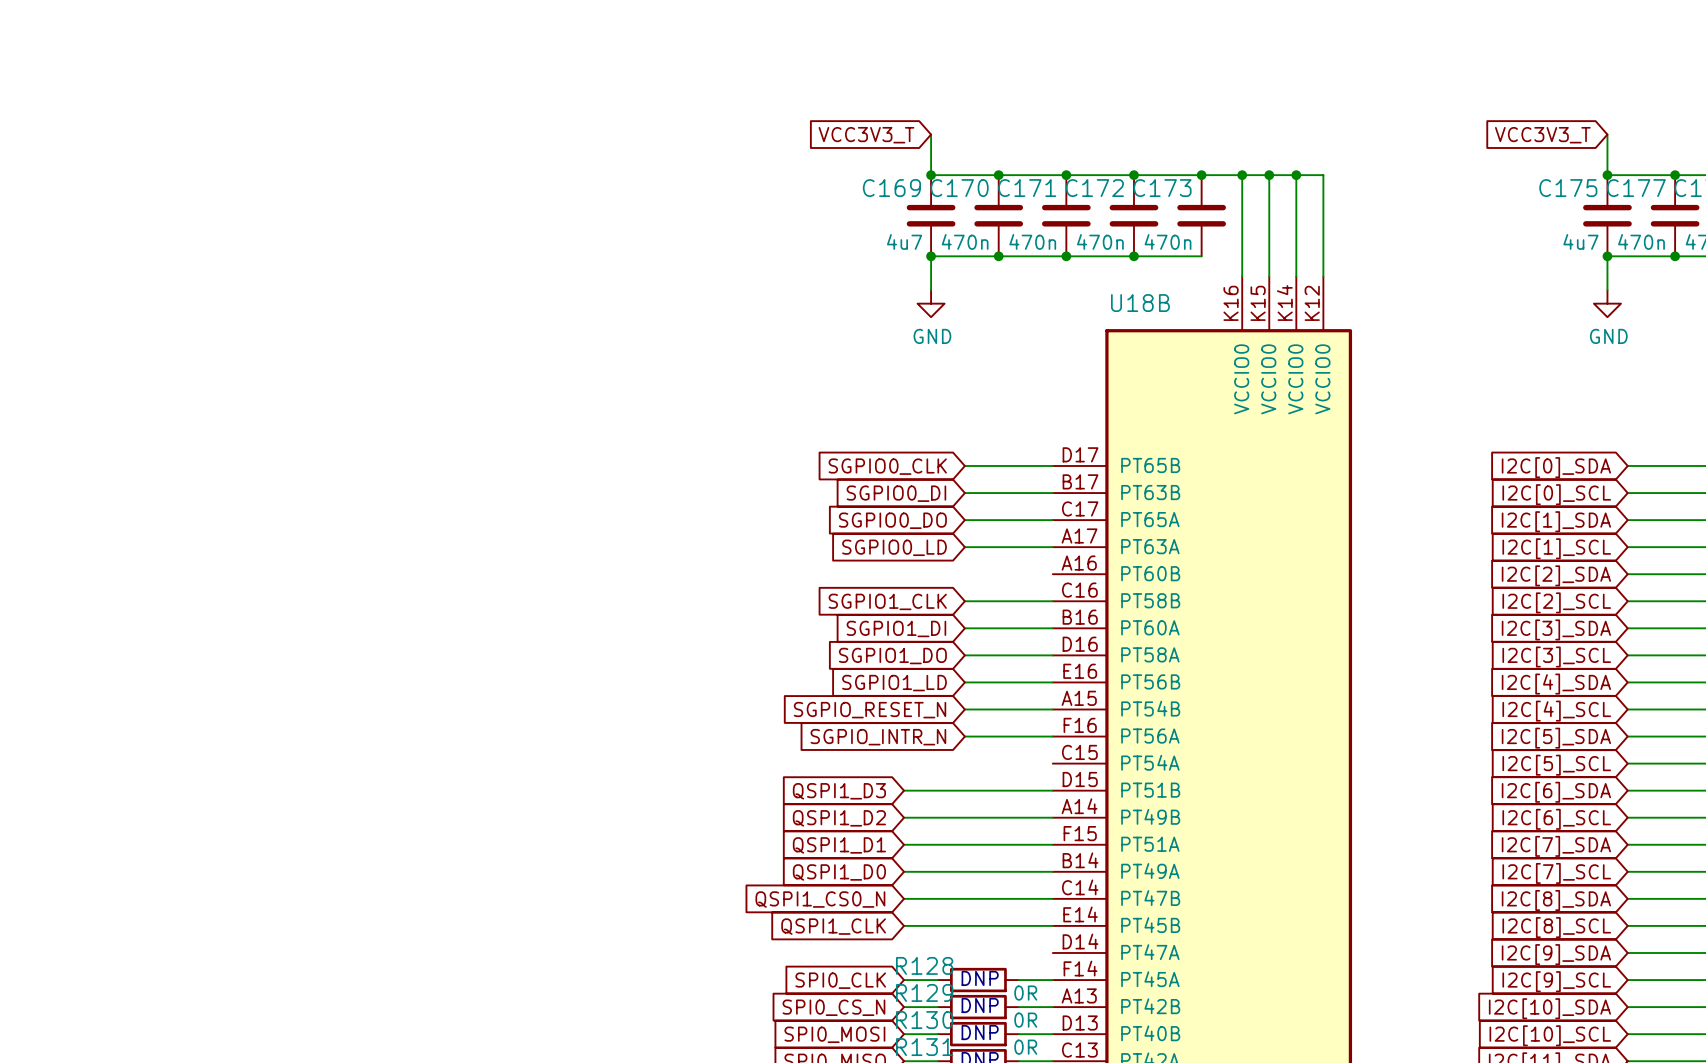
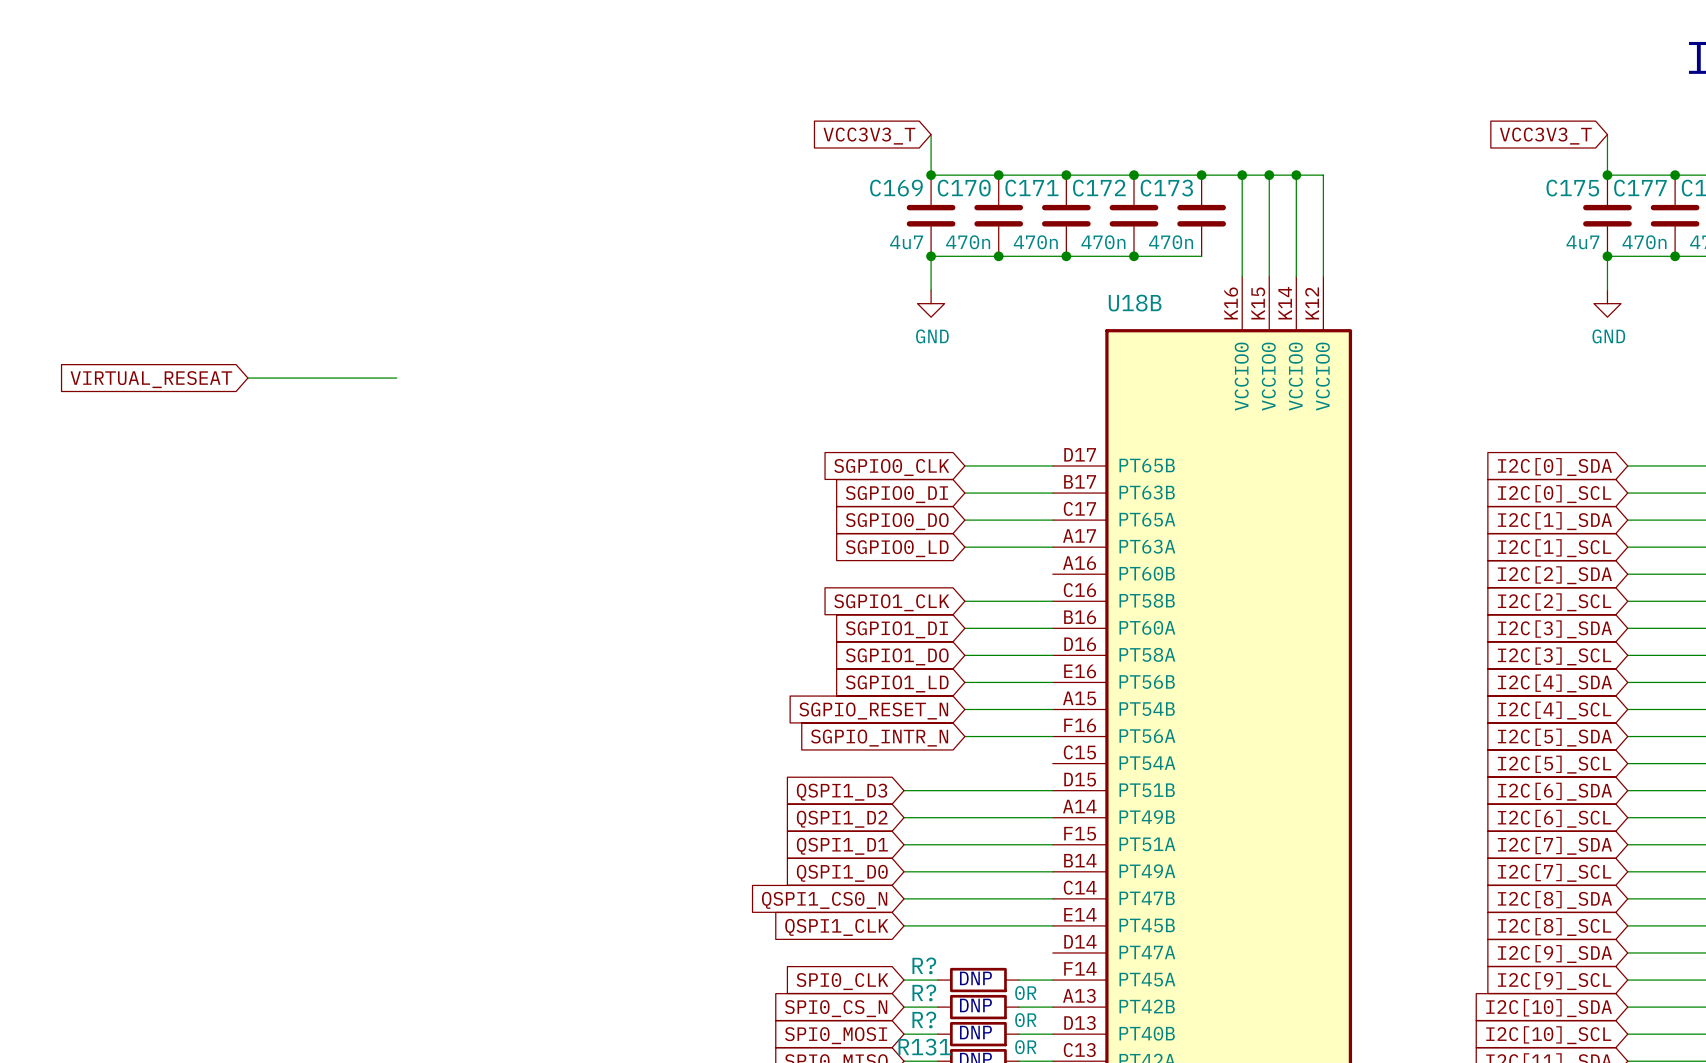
global label: none -> VIRTUAL_RESEAT (151, 379)
wire: none -> (247, 378) (396, 378)
R128 name: R128 (924, 965) -> R? (924, 965)
R129 name: R129 (924, 992) -> R? (924, 992)
R130 name: R130 (924, 1020) -> R? (924, 1019)

